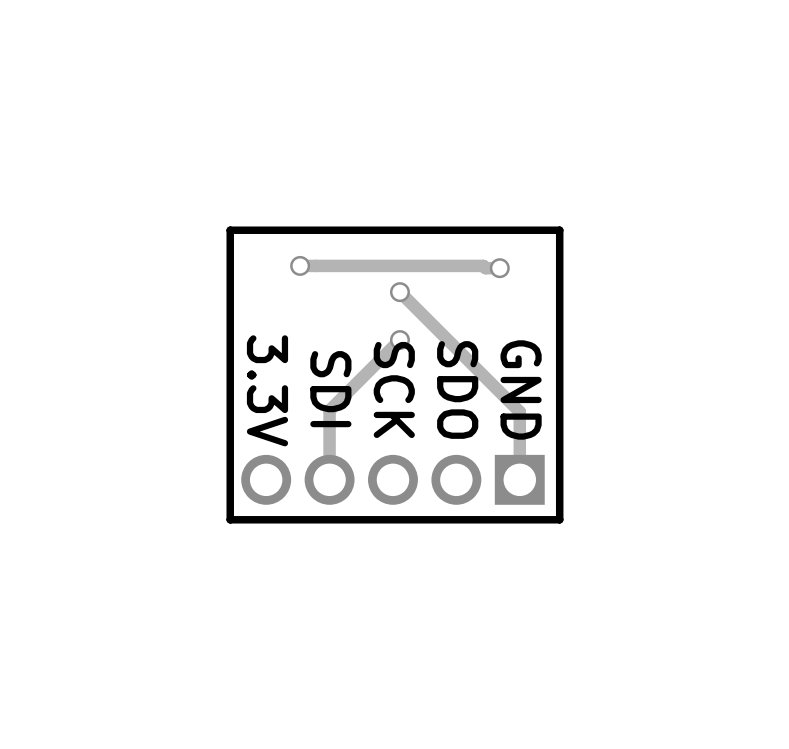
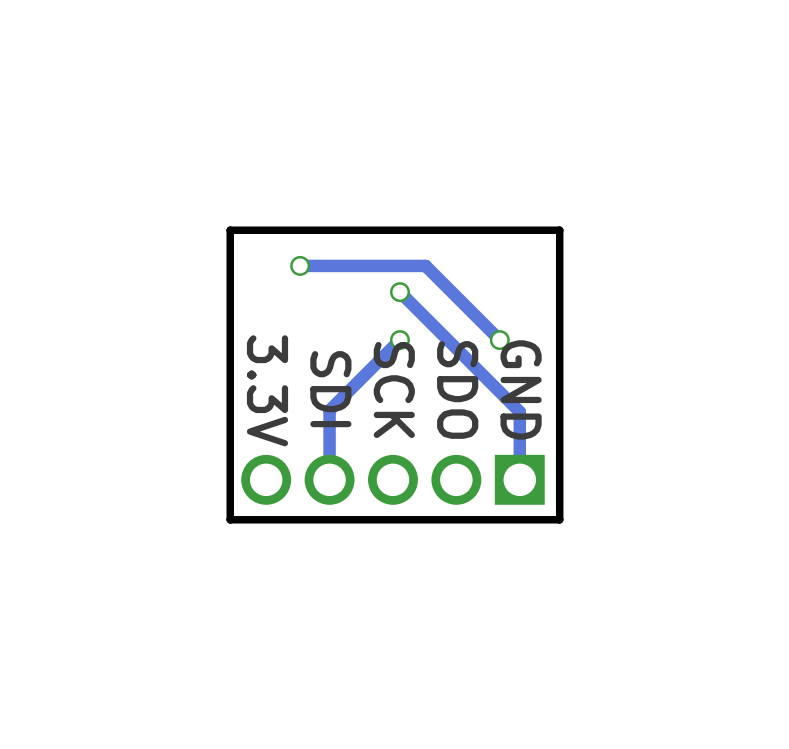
track: (425, 265) (483, 265) (485, 268) (499, 268) -> (425, 265) (499, 340)
via position: (499, 268) -> (499, 340)

